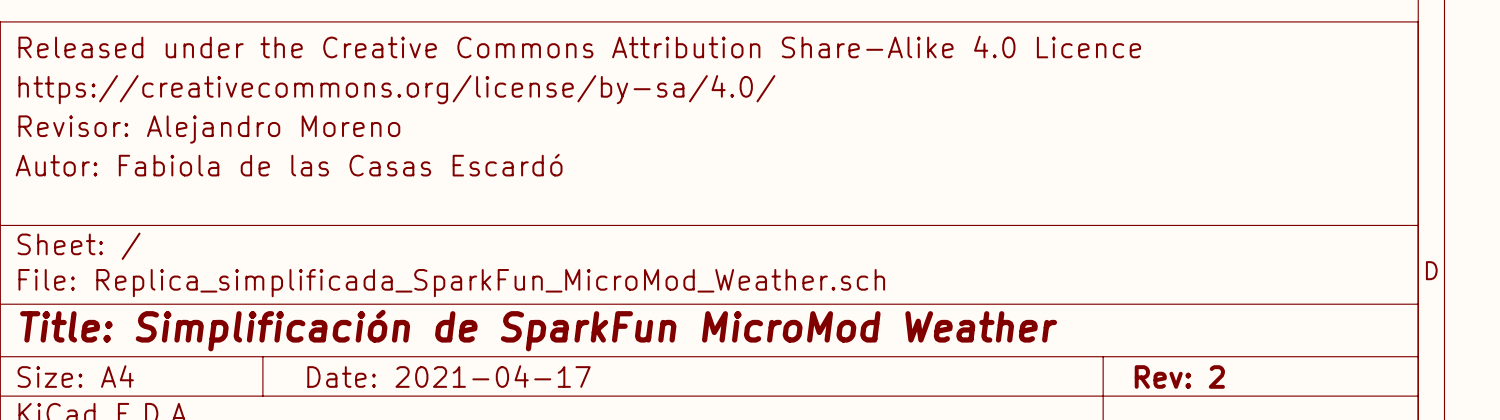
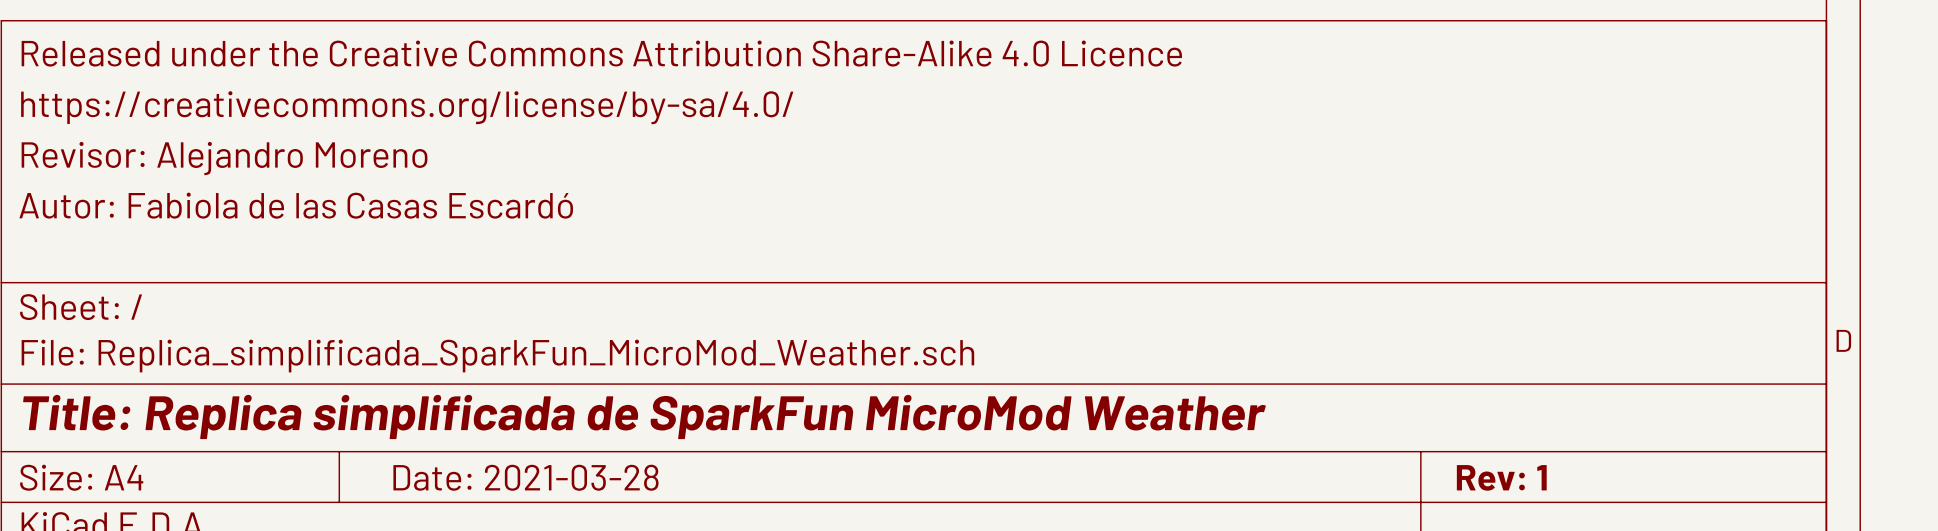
title block: Title: Simplificación de SparkFun MicroMod Weather (538, 330) -> Title: Replica simplificada de SparkFun MicroMod Weather (644, 416)
title block: Date: 2021-04-17 (448, 376) -> Date: 2021-03-28 (525, 477)
title block: Rev: 2 (1179, 376) -> Rev: 1 (1501, 477)

